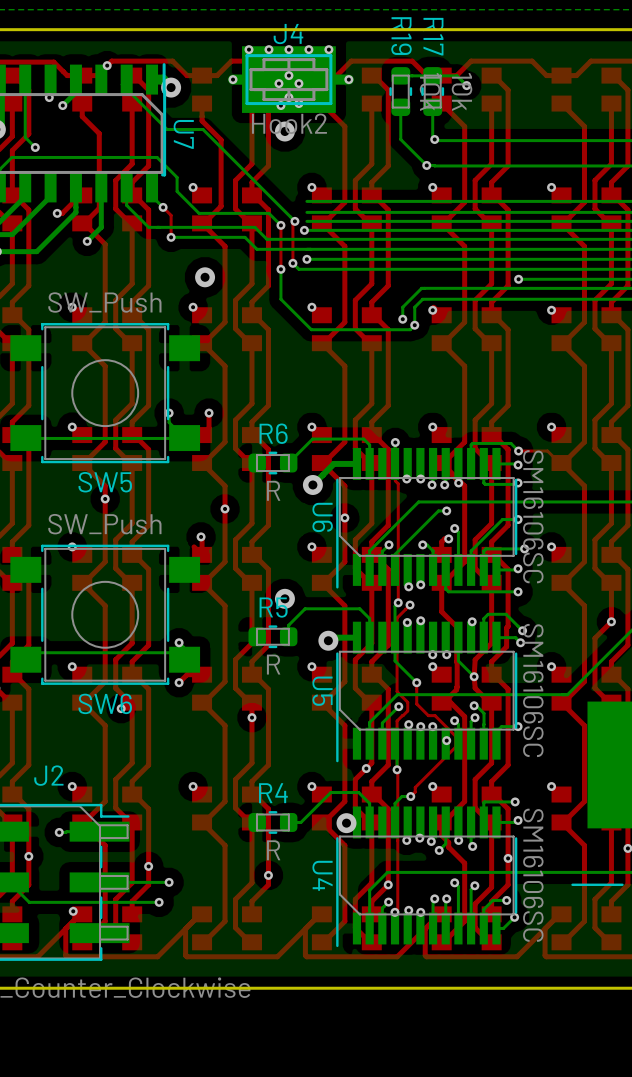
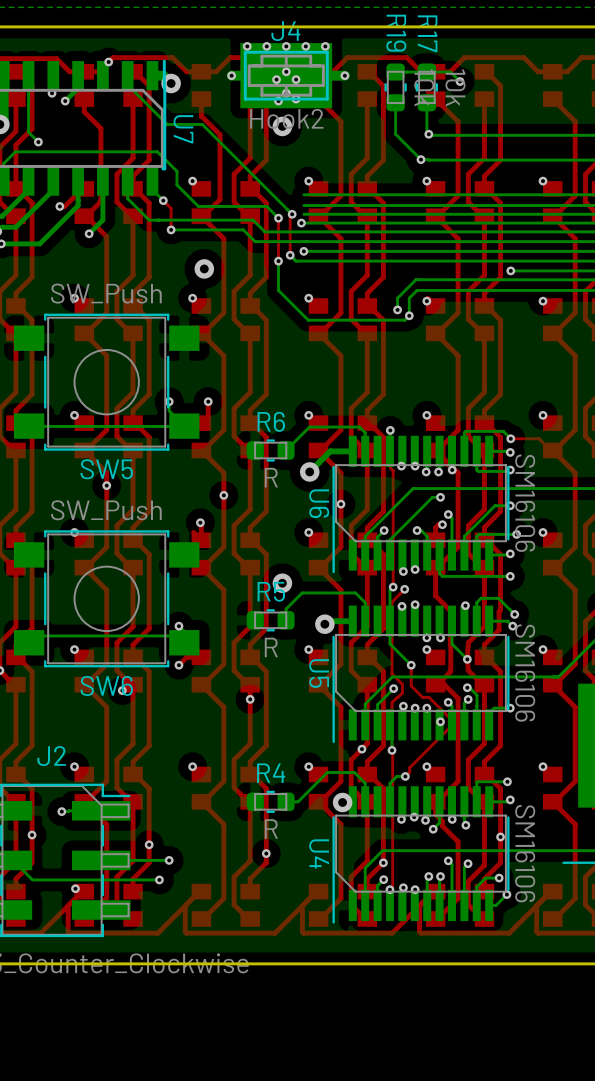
U6 value: SM16106SC (533, 516) -> SM16106 (525, 503)
U5 value: SM16106SC (533, 690) -> SM16106 (525, 673)
U4 value: SM16106SC (533, 875) -> SM16106 (525, 853)

